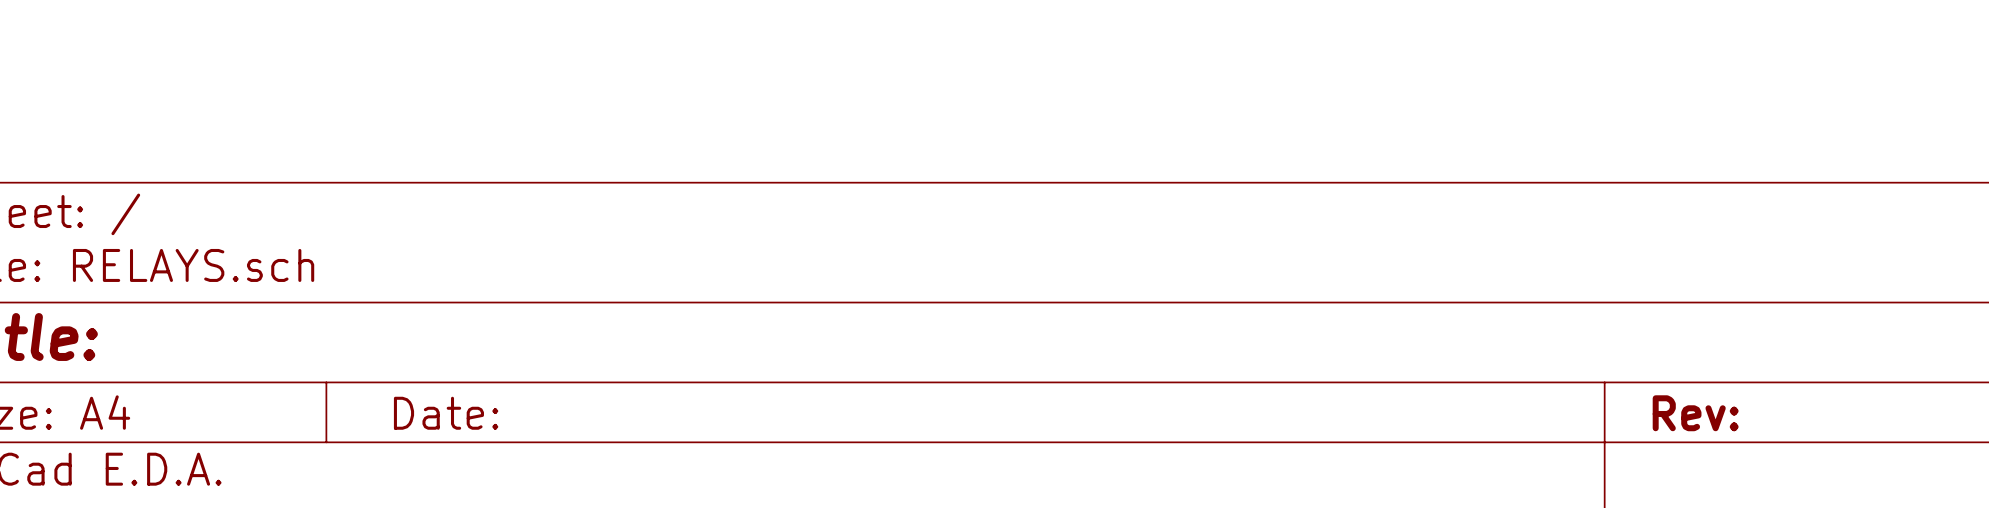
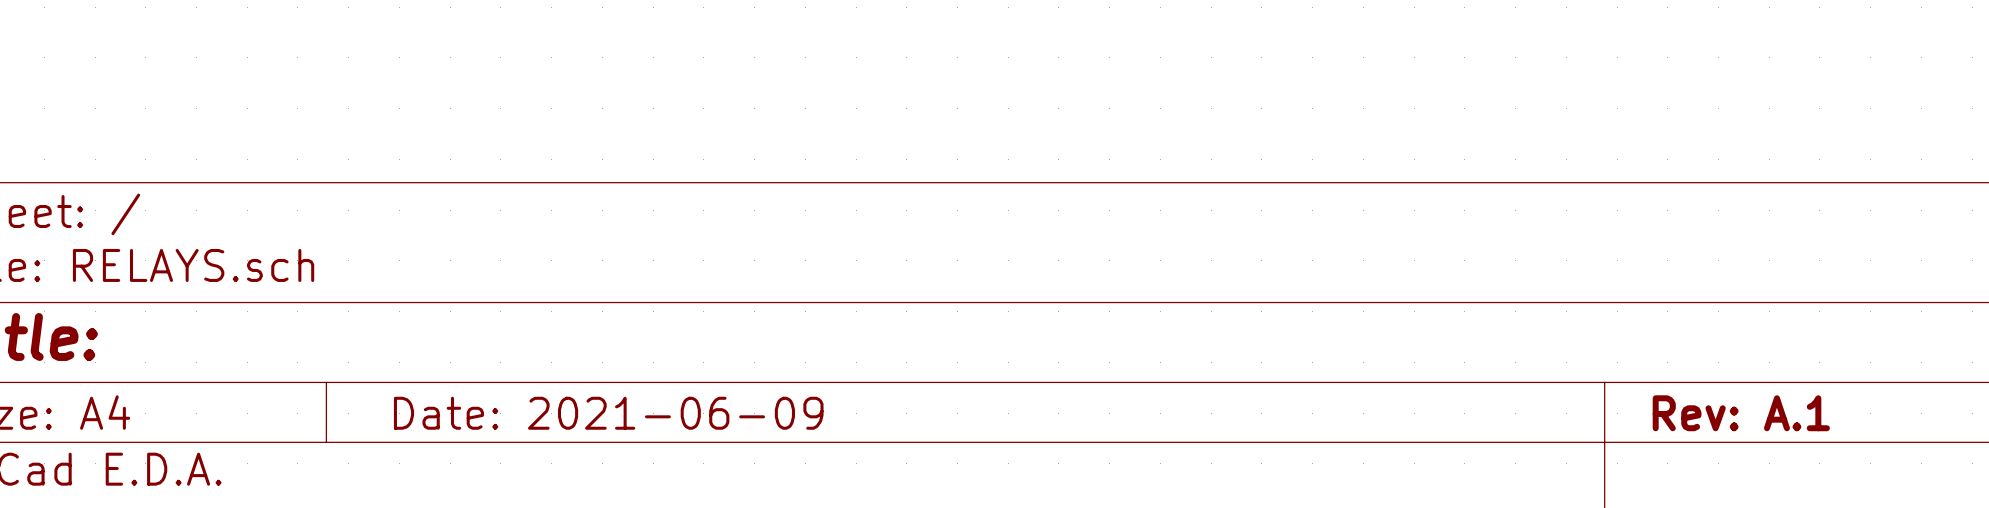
title block: Date: (446, 413) -> Date: 2021-06-09 (608, 413)
title block: Rev: (1695, 413) -> Rev: A.1 (1741, 413)

